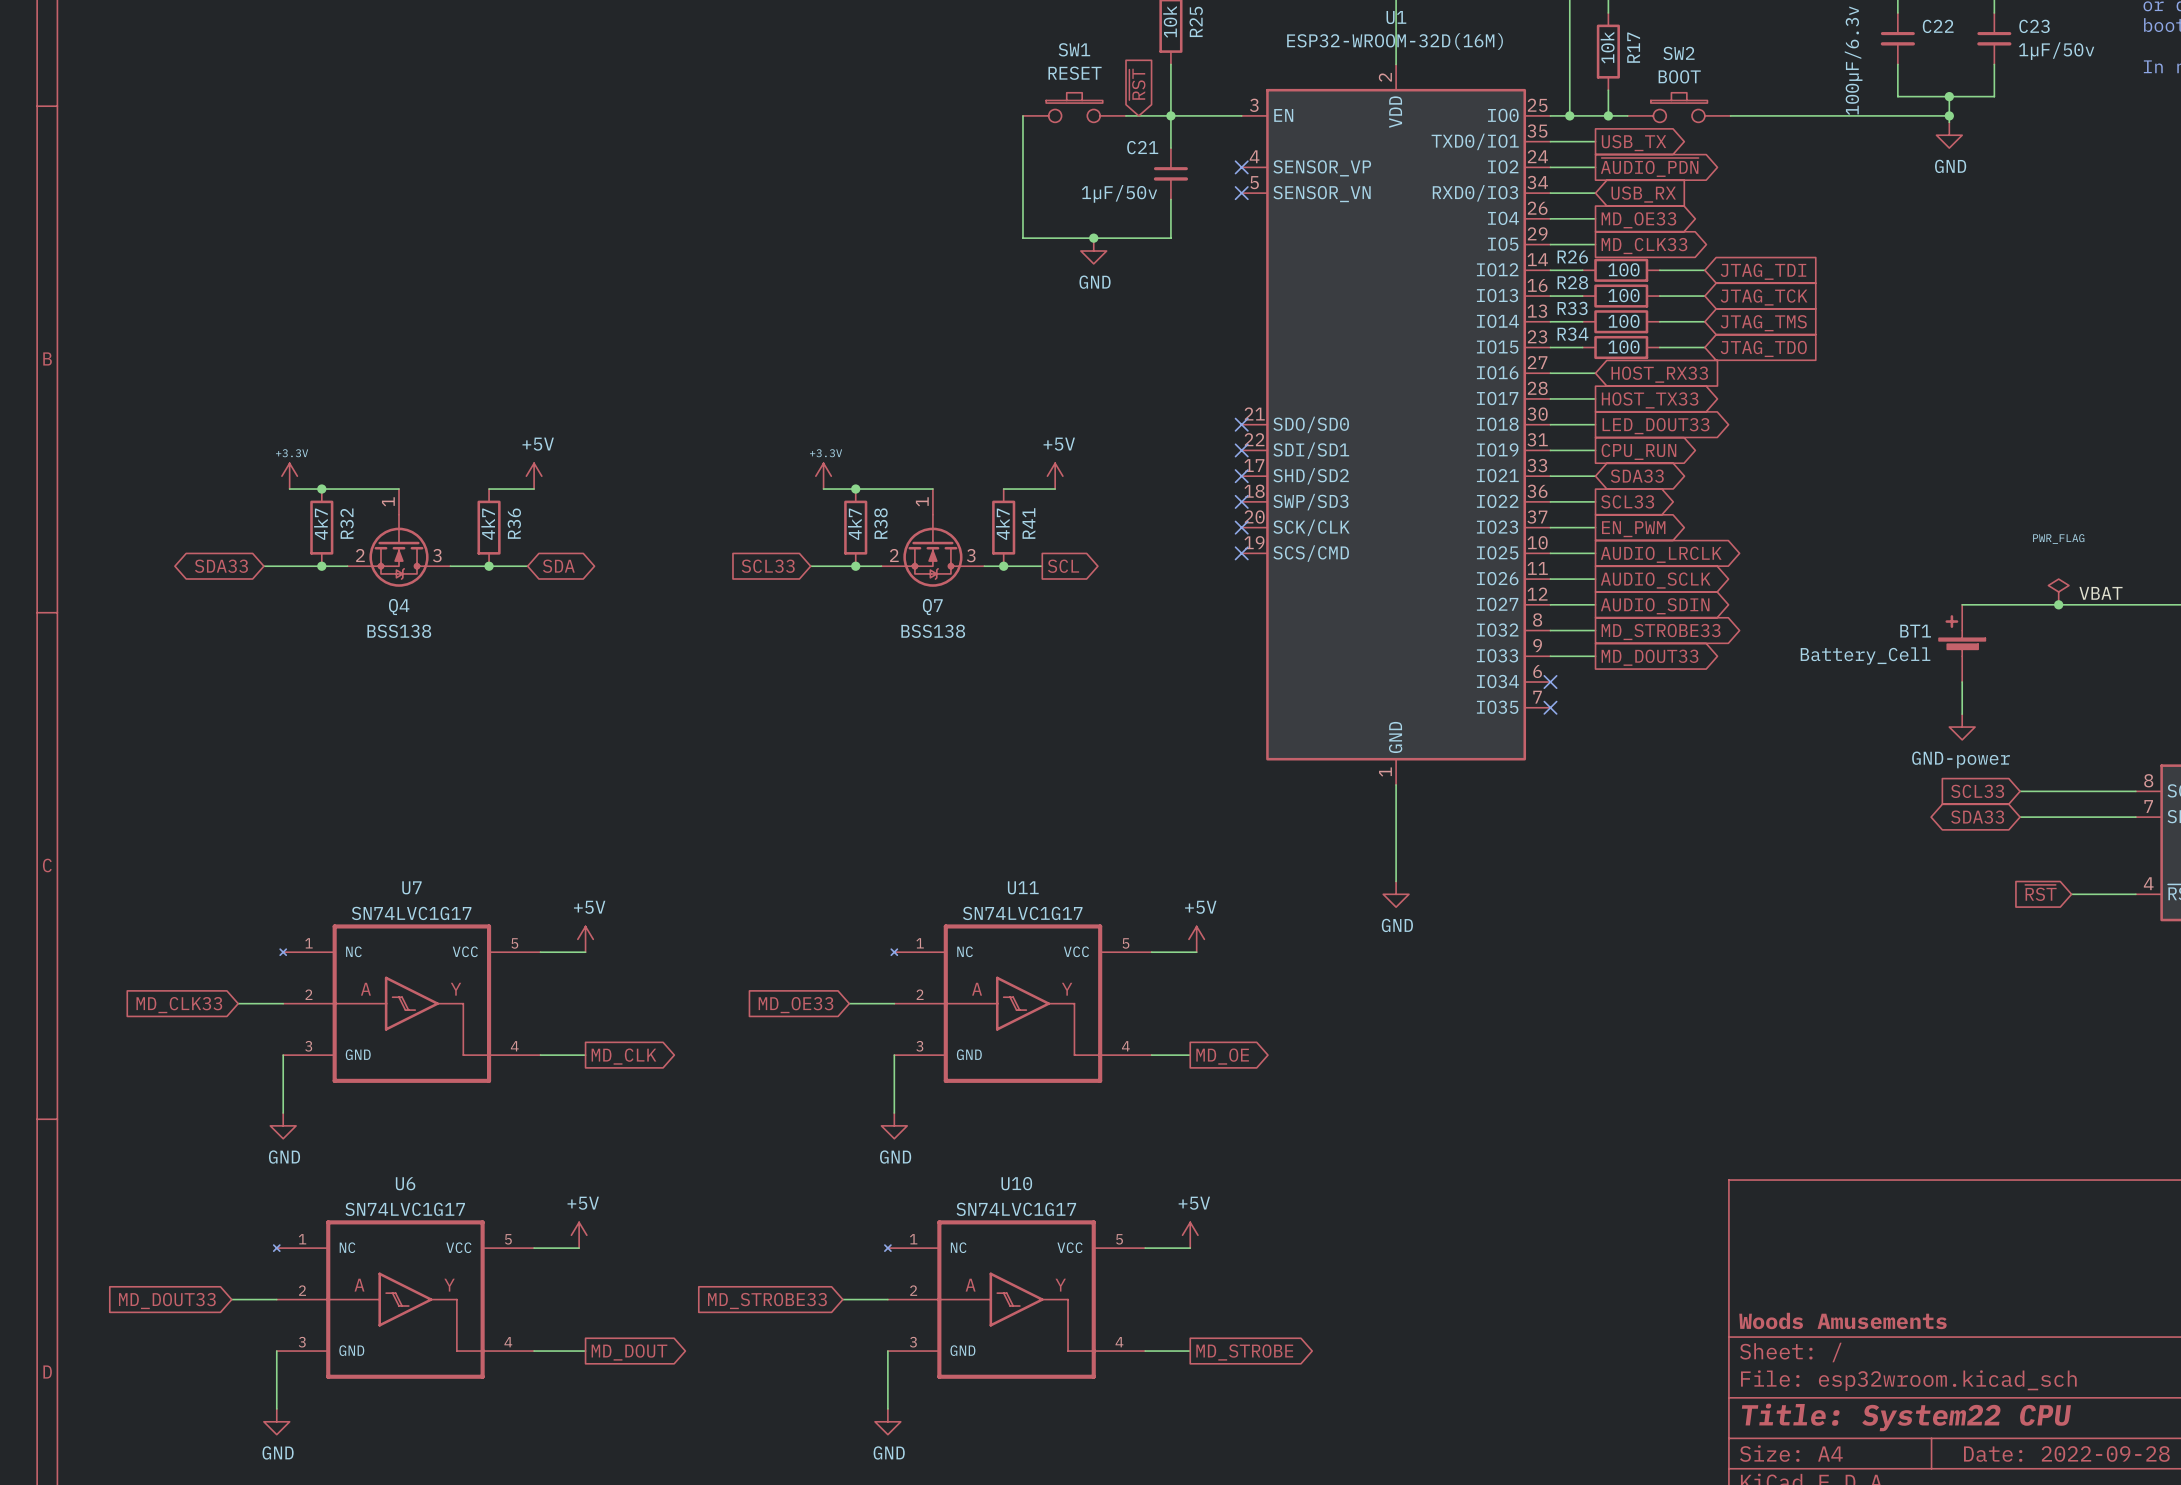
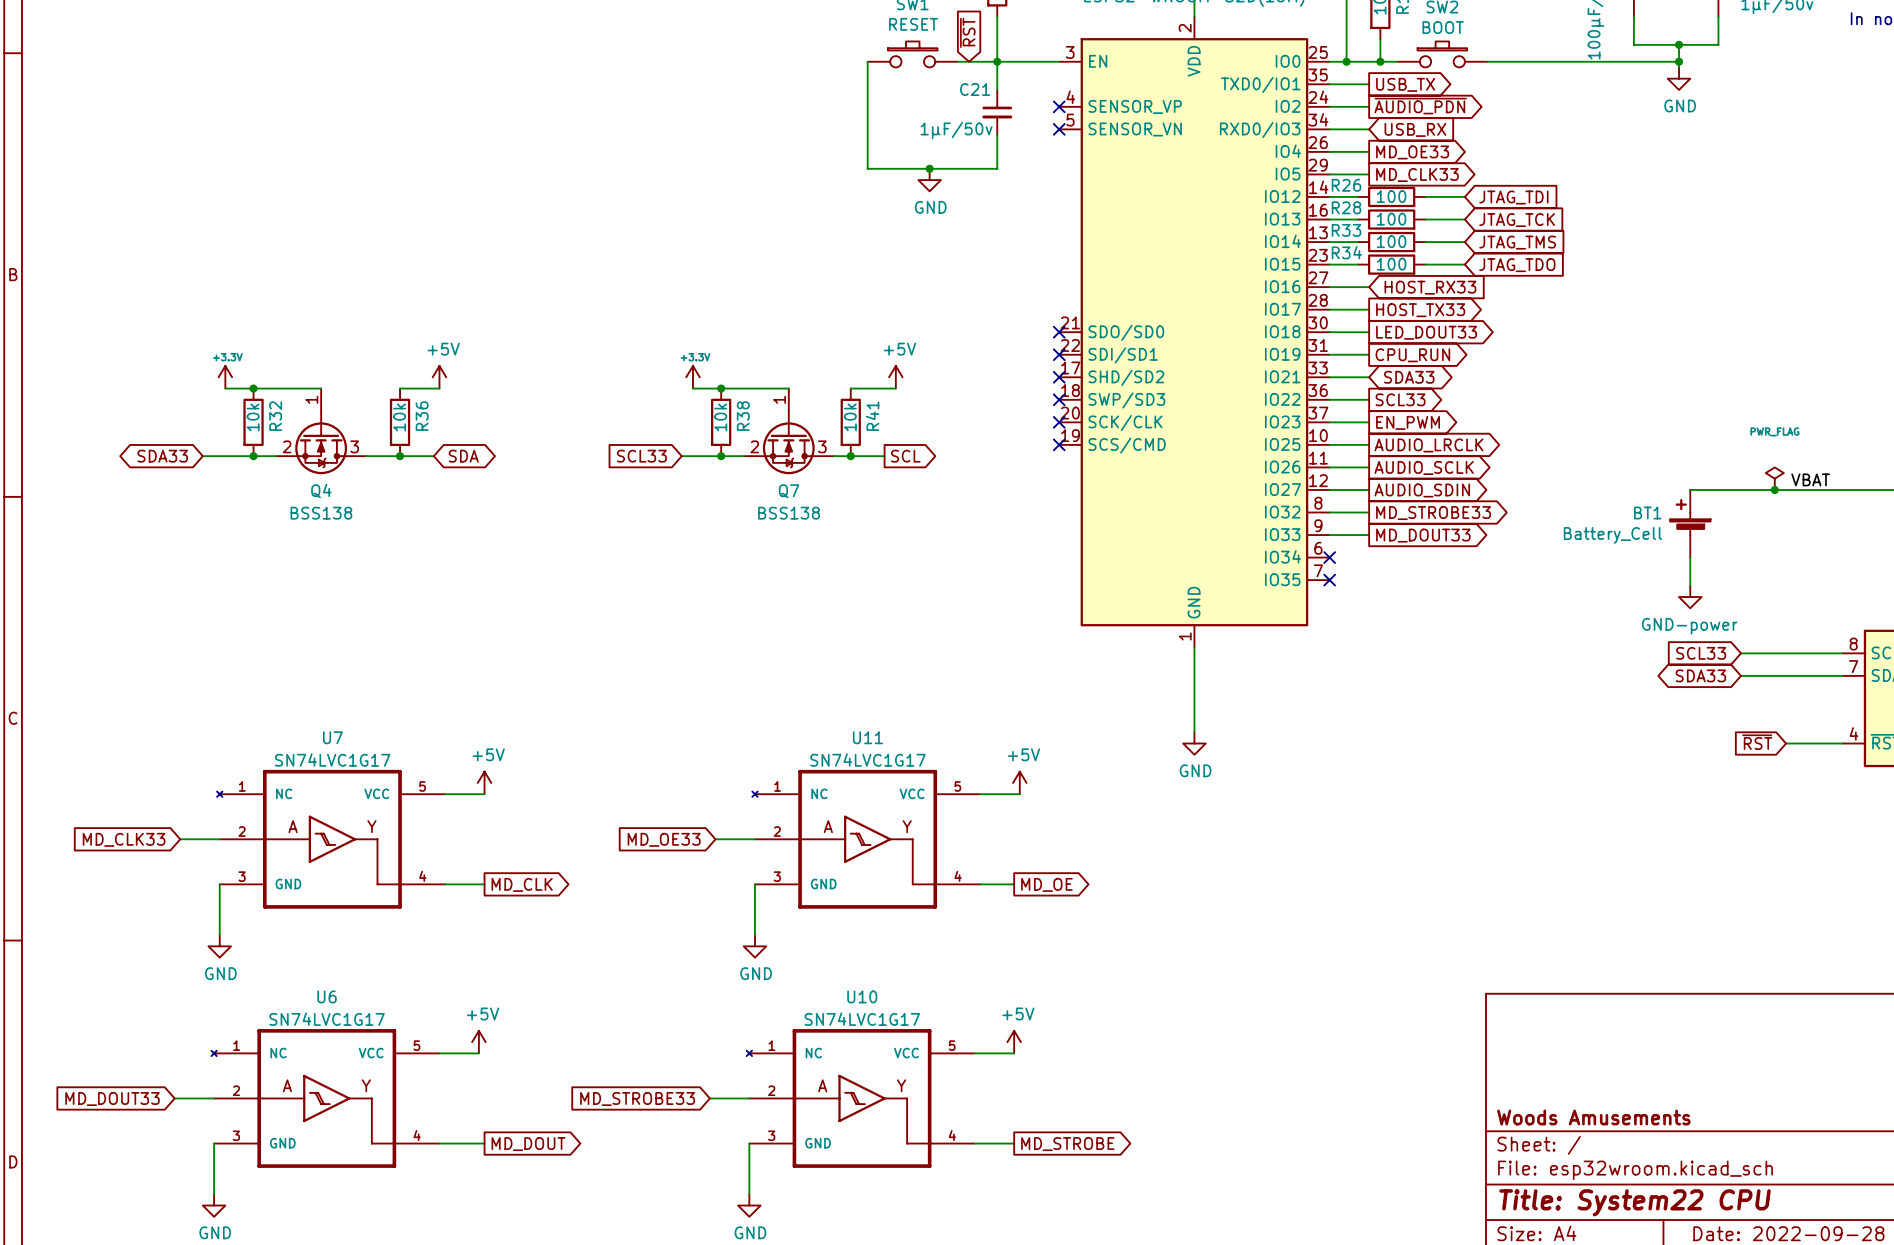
R32 value: 4k7 (320, 524) -> 10k (253, 417)
R36 value: 4k7 (488, 524) -> 10k (399, 417)
R38 value: 4k7 (854, 524) -> 10k (720, 417)
R41 value: 4k7 (1002, 524) -> 10k (850, 417)

